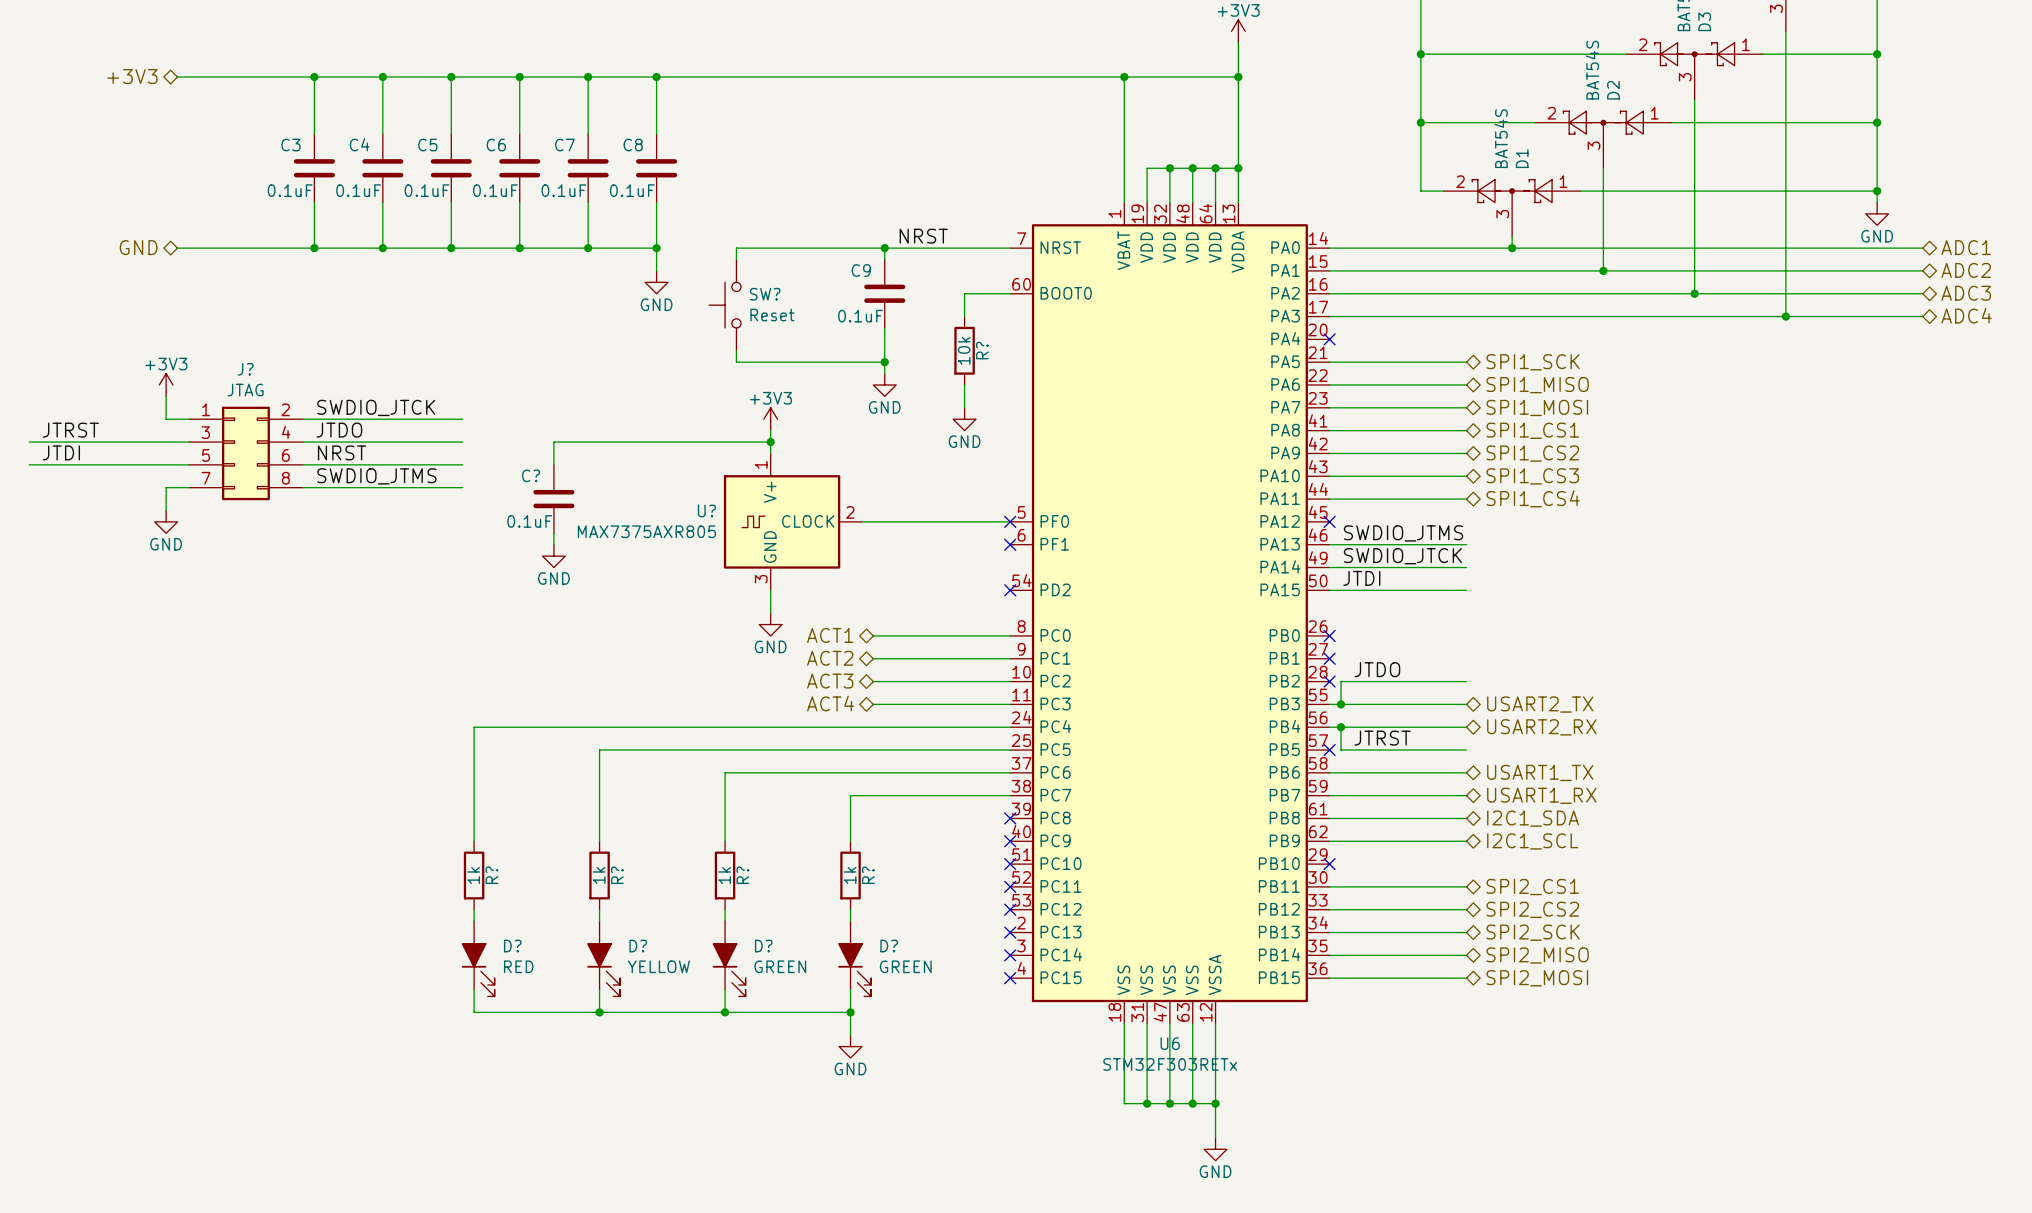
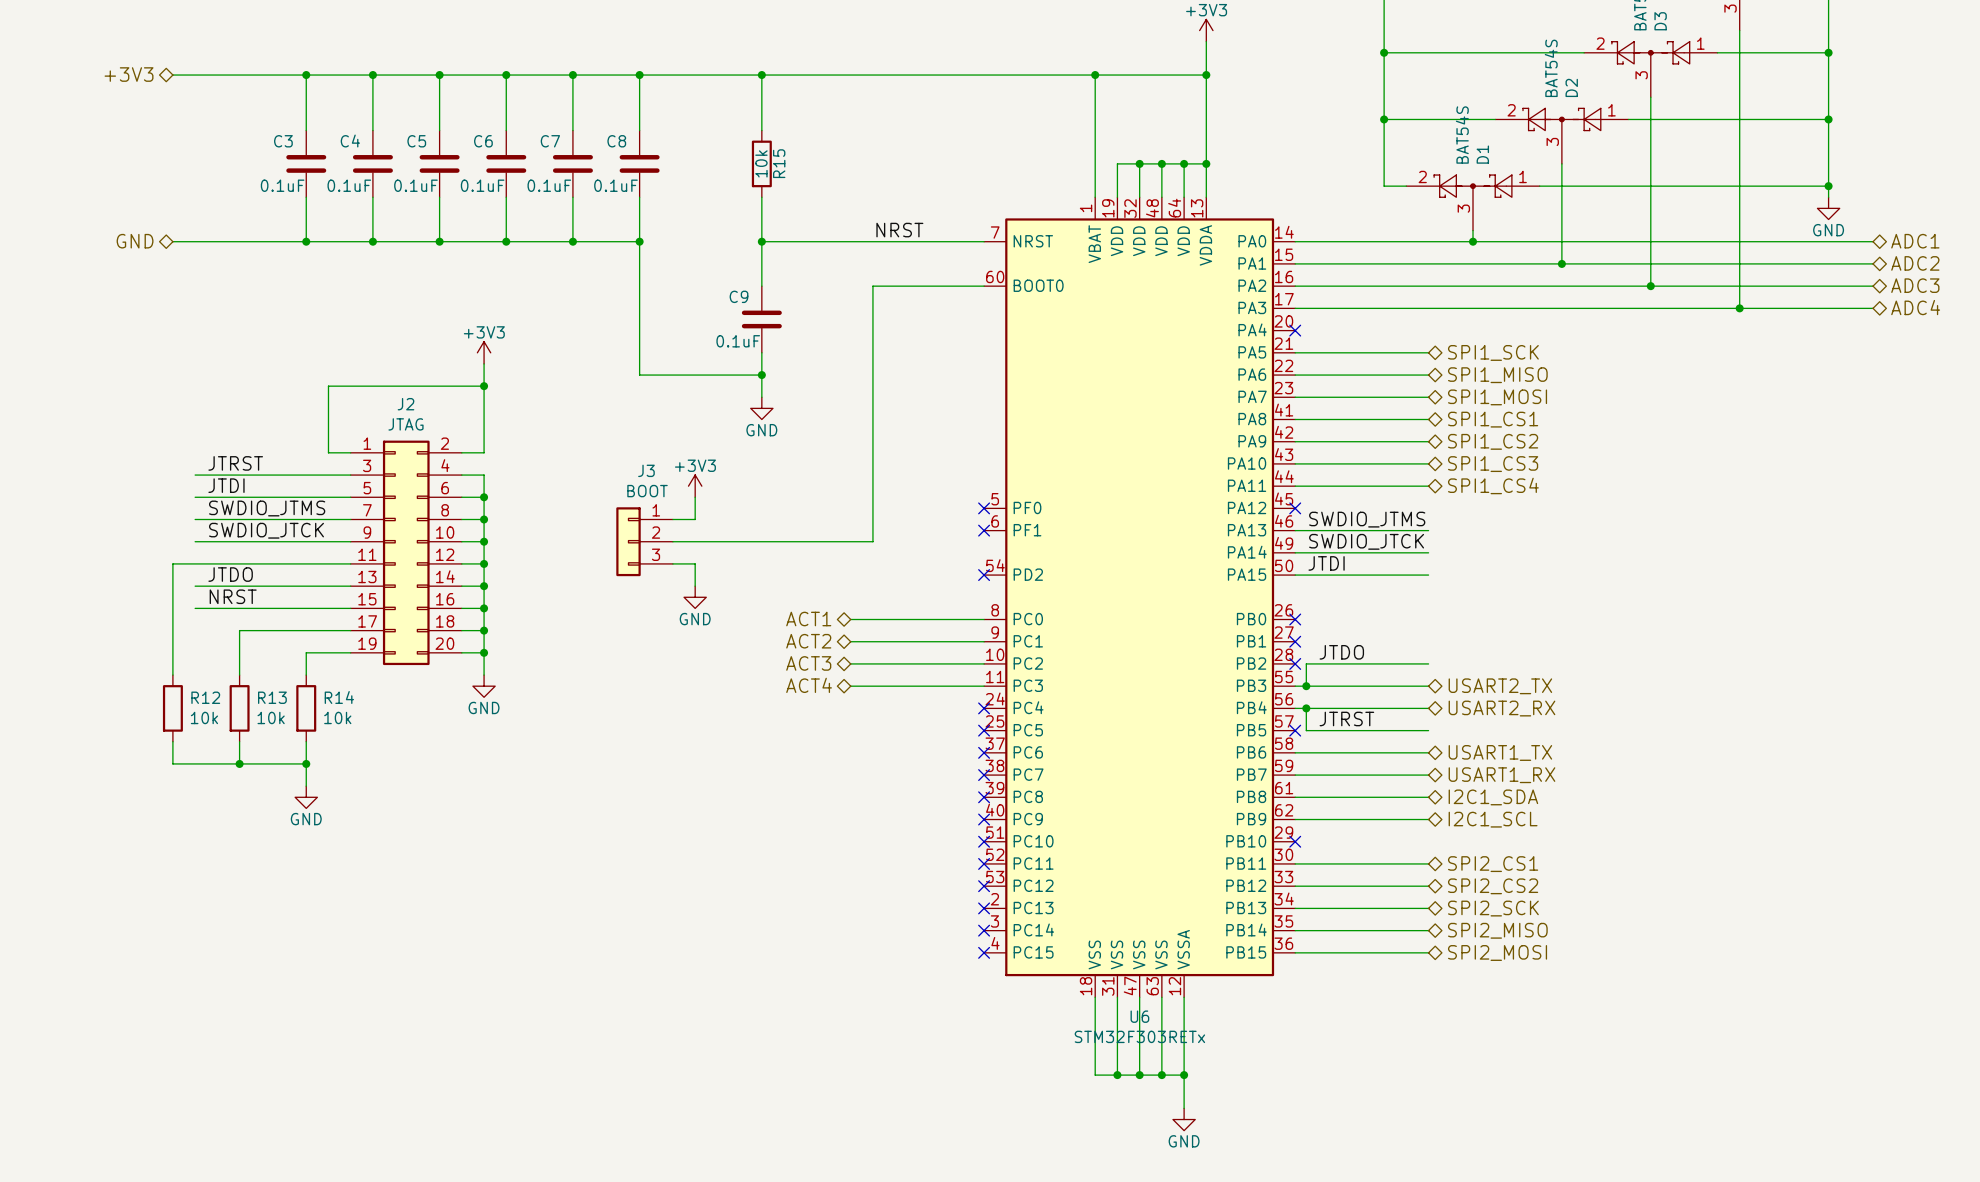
wire: none -> (761, 75) (761, 130)
junction: none -> (761, 75)
R15: none -> 10k (761, 163)
wire: none -> (761, 197) (761, 286)
wire: (782, 248) (736, 248) (736, 259) -> none
junction: none -> (761, 241)
wire: (884, 248) (884, 259) -> none
junction: (884, 248) -> none
wire: none -> (639, 263) (639, 375) (761, 375)
power symbol: GND (656, 282) -> none
C9 position: (884, 293) -> (761, 319)
wire: (964, 293) (964, 316) -> (939, 286) (872, 286) (872, 541) (672, 541)
SW?: Reset (725, 305) -> none
wire: (884, 327) (884, 373) -> (761, 352) (761, 397)
wire: (736, 350) (736, 362) (884, 362) -> none
R?: 10k (964, 350) -> none
power symbol: none -> +3V3 (484, 352)
junction: (884, 362) -> none
wire: none -> (484, 363) (484, 452) (461, 452)
power symbol: +3V3 (166, 385) -> none
junction: none -> (761, 375)
power symbol: GND (884, 385) -> none
wire: (964, 385) (964, 407) -> none
wire: (166, 396) (166, 419) (188, 419) -> none
junction: none -> (484, 386)
label position: SWDIO_JTCK (376, 407) -> SWDIO_JTCK (266, 530)
wire: (302, 419) (462, 419) -> (195, 497) (350, 497)
power symbol position: +3V3 (770, 419) -> +3V3 (695, 486)
power symbol: none -> GND (761, 408)
power symbol: GND (964, 419) -> none
label position: JTRST (70, 430) -> JTRST (235, 463)
label position: JTDO (339, 430) -> JTDO (230, 574)
wire: (770, 430) (770, 453) -> none
wire: (29, 442) (188, 442) -> none
wire: (302, 442) (462, 442) -> (195, 519) (350, 519)
wire: (770, 442) (553, 442) (553, 464) -> none
junction: (770, 442) -> none
label position: JTDI (61, 452) -> JTDI (226, 485)
label position: NRST (342, 452) -> NRST (233, 596)
J?: JTAG (245, 453) -> none
wire: (29, 464) (188, 464) -> (195, 541) (350, 541)
wire: (302, 464) (337, 464) -> (484, 386) (328, 386) (328, 452)
label position: SWDIO_JTMS (376, 476) -> SWDIO_JTMS (267, 508)
wire: (188, 487) (166, 487) (166, 510) -> none
wire: none -> (461, 475) (484, 475) (484, 675)
C?: 0.1uF (553, 499) -> none
wire: none -> (461, 497) (484, 497)
junction: none -> (484, 497)
wire: none -> (695, 497) (695, 519) (672, 519)
power symbol: GND (166, 521) -> none
U?: MAX7375AXR805 (792, 521) -> none
wire: (861, 521) (1010, 521) -> none
wire: none -> (461, 519) (484, 519)
junction: none -> (484, 519)
wire: (553, 533) (553, 544) -> none
wire: none -> (461, 541) (484, 541)
junction: none -> (484, 541)
power symbol: GND (553, 556) -> none
J3: none -> BOOT (644, 541)
J2: none -> JTAG (406, 552)
wire: none -> (350, 563) (172, 563) (172, 675)
wire: none -> (461, 563) (484, 563)
junction: none -> (484, 563)
wire: none -> (672, 563) (695, 563) (695, 586)
wire: (770, 590) (770, 613) -> none
wire: none -> (195, 586) (350, 586)
wire: none -> (461, 586) (484, 586)
junction: none -> (484, 586)
wire: none -> (195, 608) (350, 608)
wire: none -> (461, 608) (484, 608)
junction: none -> (484, 608)
power symbol position: GND (770, 624) -> GND (695, 597)
wire: none -> (350, 630) (239, 630) (239, 675)
wire: none -> (461, 630) (484, 630)
junction: none -> (484, 630)
wire: none -> (350, 652) (306, 652) (306, 675)
wire: none -> (461, 652) (484, 652)
junction: none -> (484, 652)
power symbol: none -> GND (484, 686)
R12: none -> 10k (172, 708)
R13: none -> 10k (239, 708)
R14: none -> 10k (306, 708)
wire: (1010, 727) (474, 727) (474, 841) -> none
no-connect mark: none -> (984, 708)
wire: (1010, 750) (599, 750) (599, 841) -> none
no-connect mark: none -> (984, 730)
wire: none -> (172, 741) (172, 763) (306, 763)
wire: none -> (239, 741) (239, 763)
wire: none -> (306, 741) (306, 786)
wire: (1010, 772) (725, 772) (725, 841) -> none
no-connect mark: none -> (984, 752)
junction: none -> (239, 763)
junction: none -> (306, 763)
wire: (1010, 795) (850, 795) (850, 841) -> none
no-connect mark: none -> (984, 775)
power symbol: none -> GND (306, 797)
R?: 1k (474, 875) -> none
R?: 1k (599, 875) -> none
R?: 1k (725, 875) -> none
R?: 1k (850, 875) -> none
wire: (474, 909) (474, 921) -> none
wire: (599, 909) (599, 921) -> none
wire: (725, 909) (725, 921) -> none
wire: (850, 909) (850, 921) -> none
D?: RED (478, 958) -> none
D?: YELLOW (603, 958) -> none
D?: GREEN (729, 958) -> none
D?: GREEN (854, 958) -> none
wire: (474, 989) (474, 1012) (850, 1012) -> none
wire: (599, 989) (599, 1012) -> none
wire: (725, 989) (725, 1012) -> none
wire: (850, 989) (850, 1035) -> none
junction: (599, 1012) -> none
junction: (725, 1012) -> none
junction: (850, 1012) -> none
power symbol: GND (850, 1046) -> none

